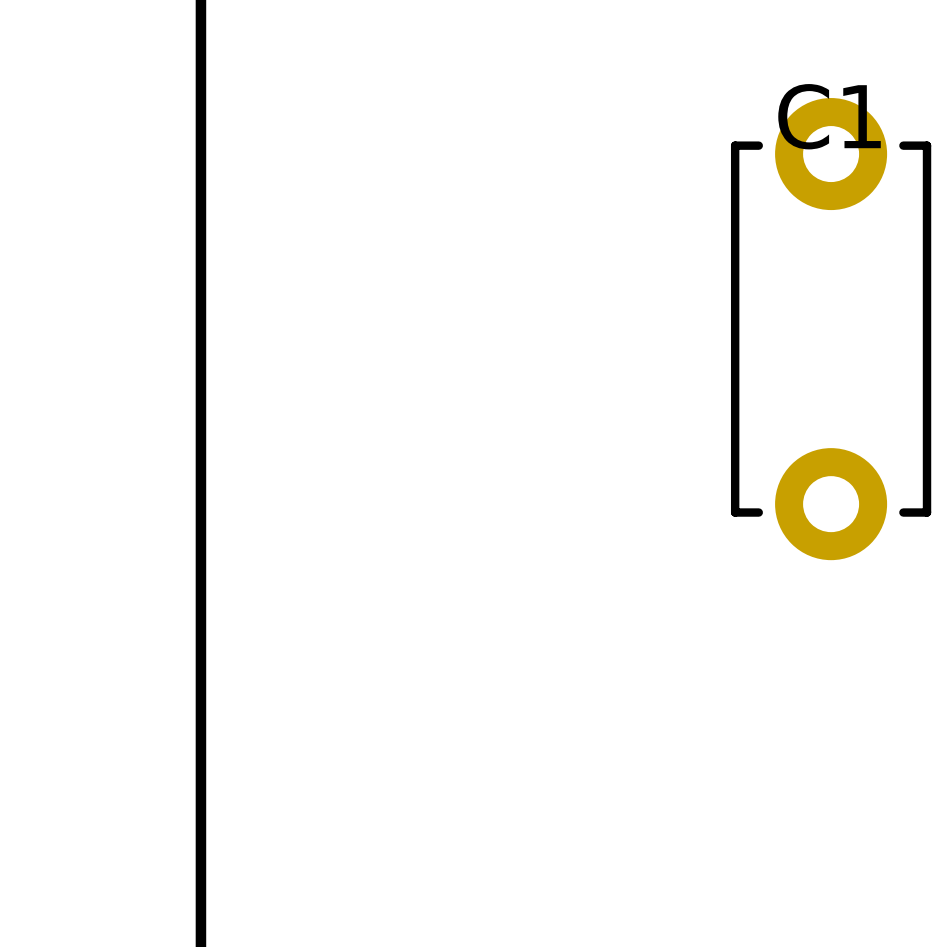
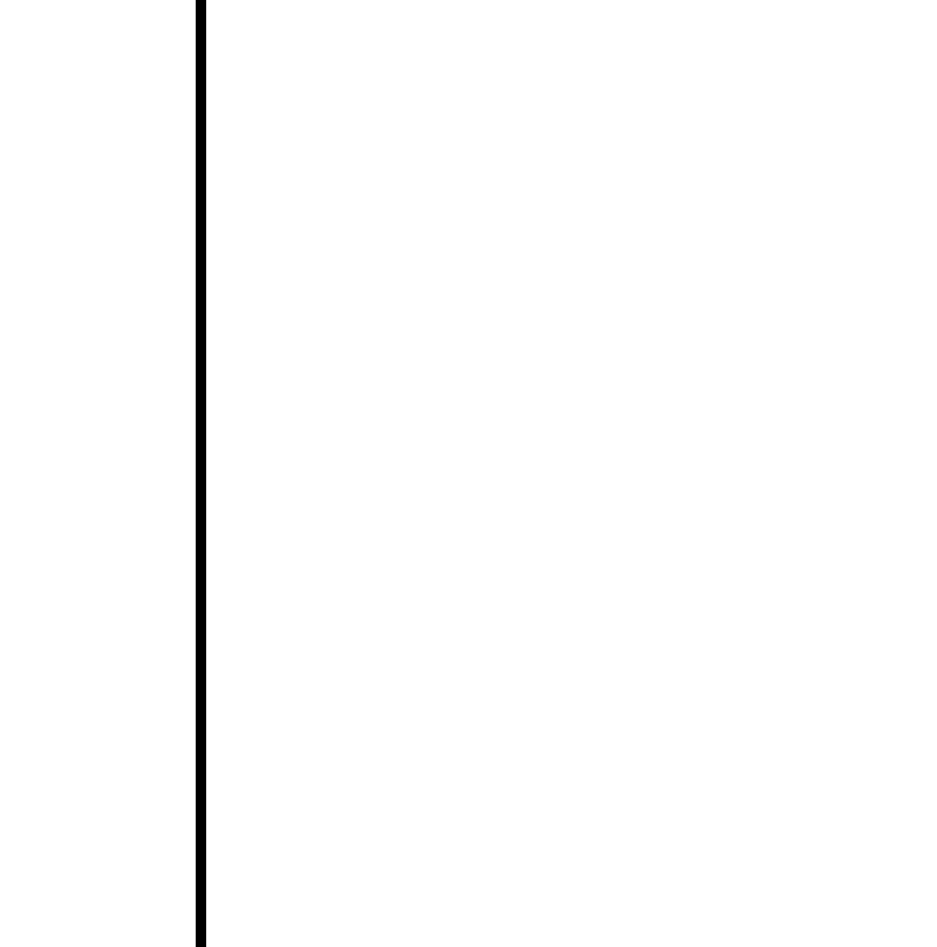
text: C1 (829, 116) -> none
part: (831, 329) -> none

